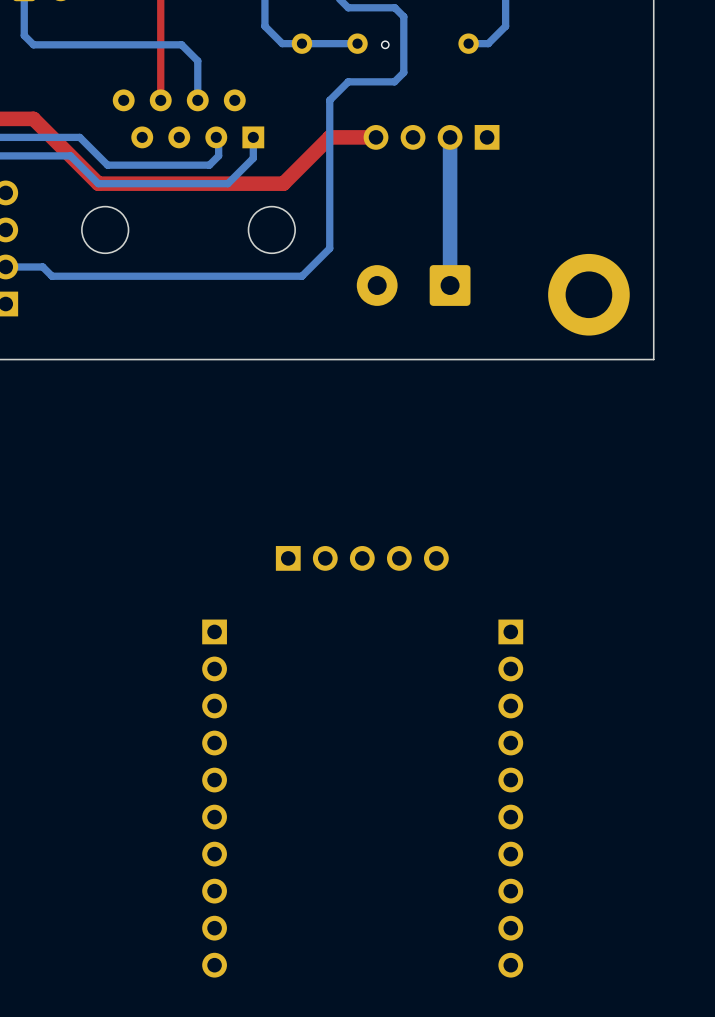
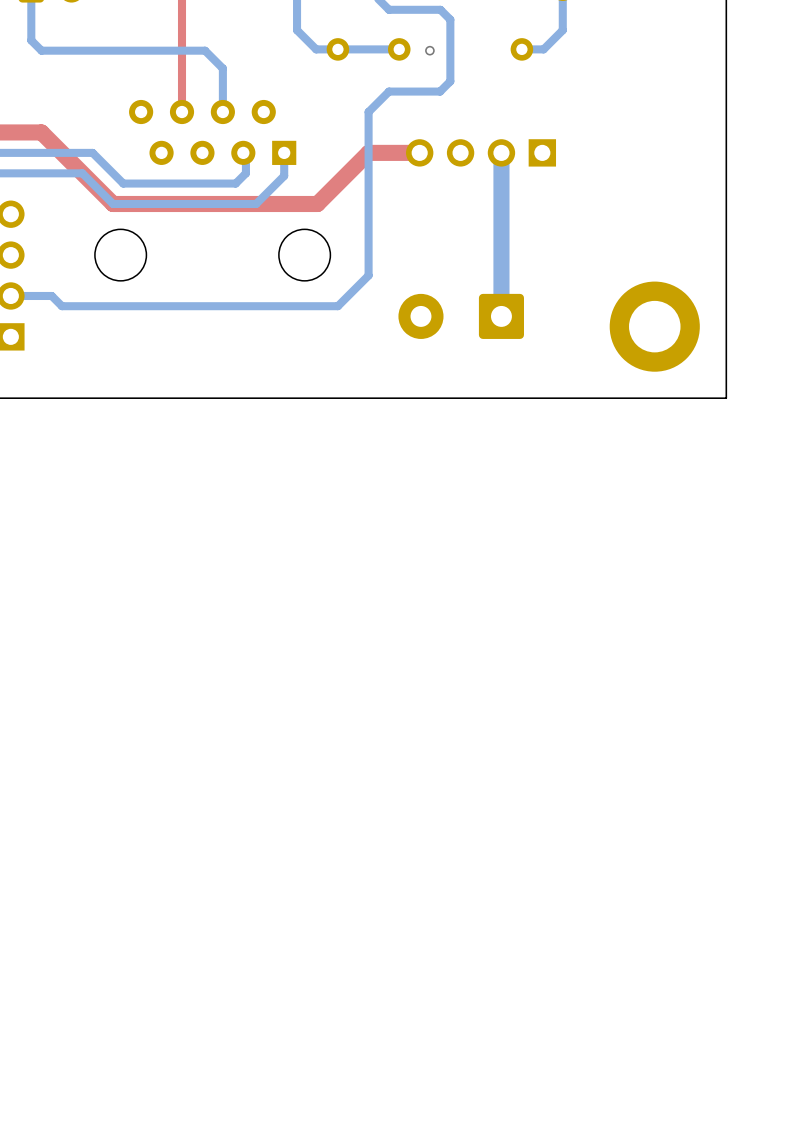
part: (362, 558) -> none
part: (214, 798) -> none
part: (510, 798) -> none

